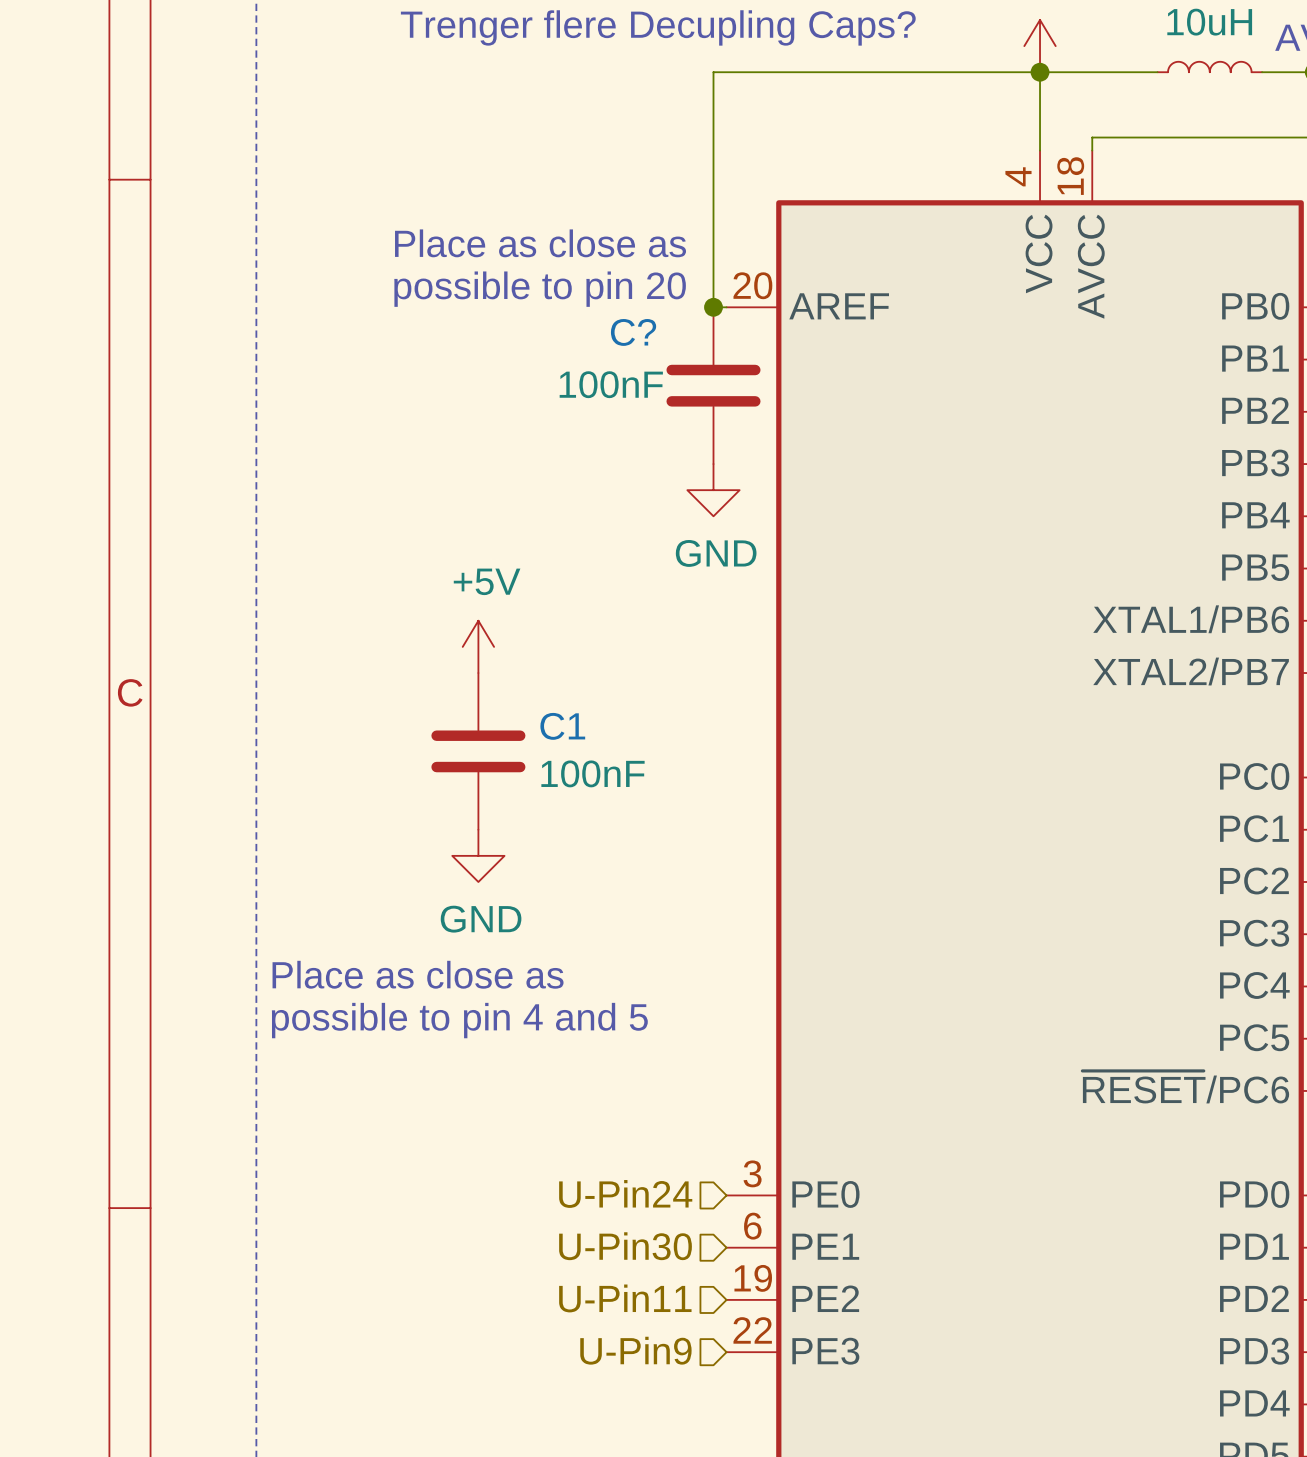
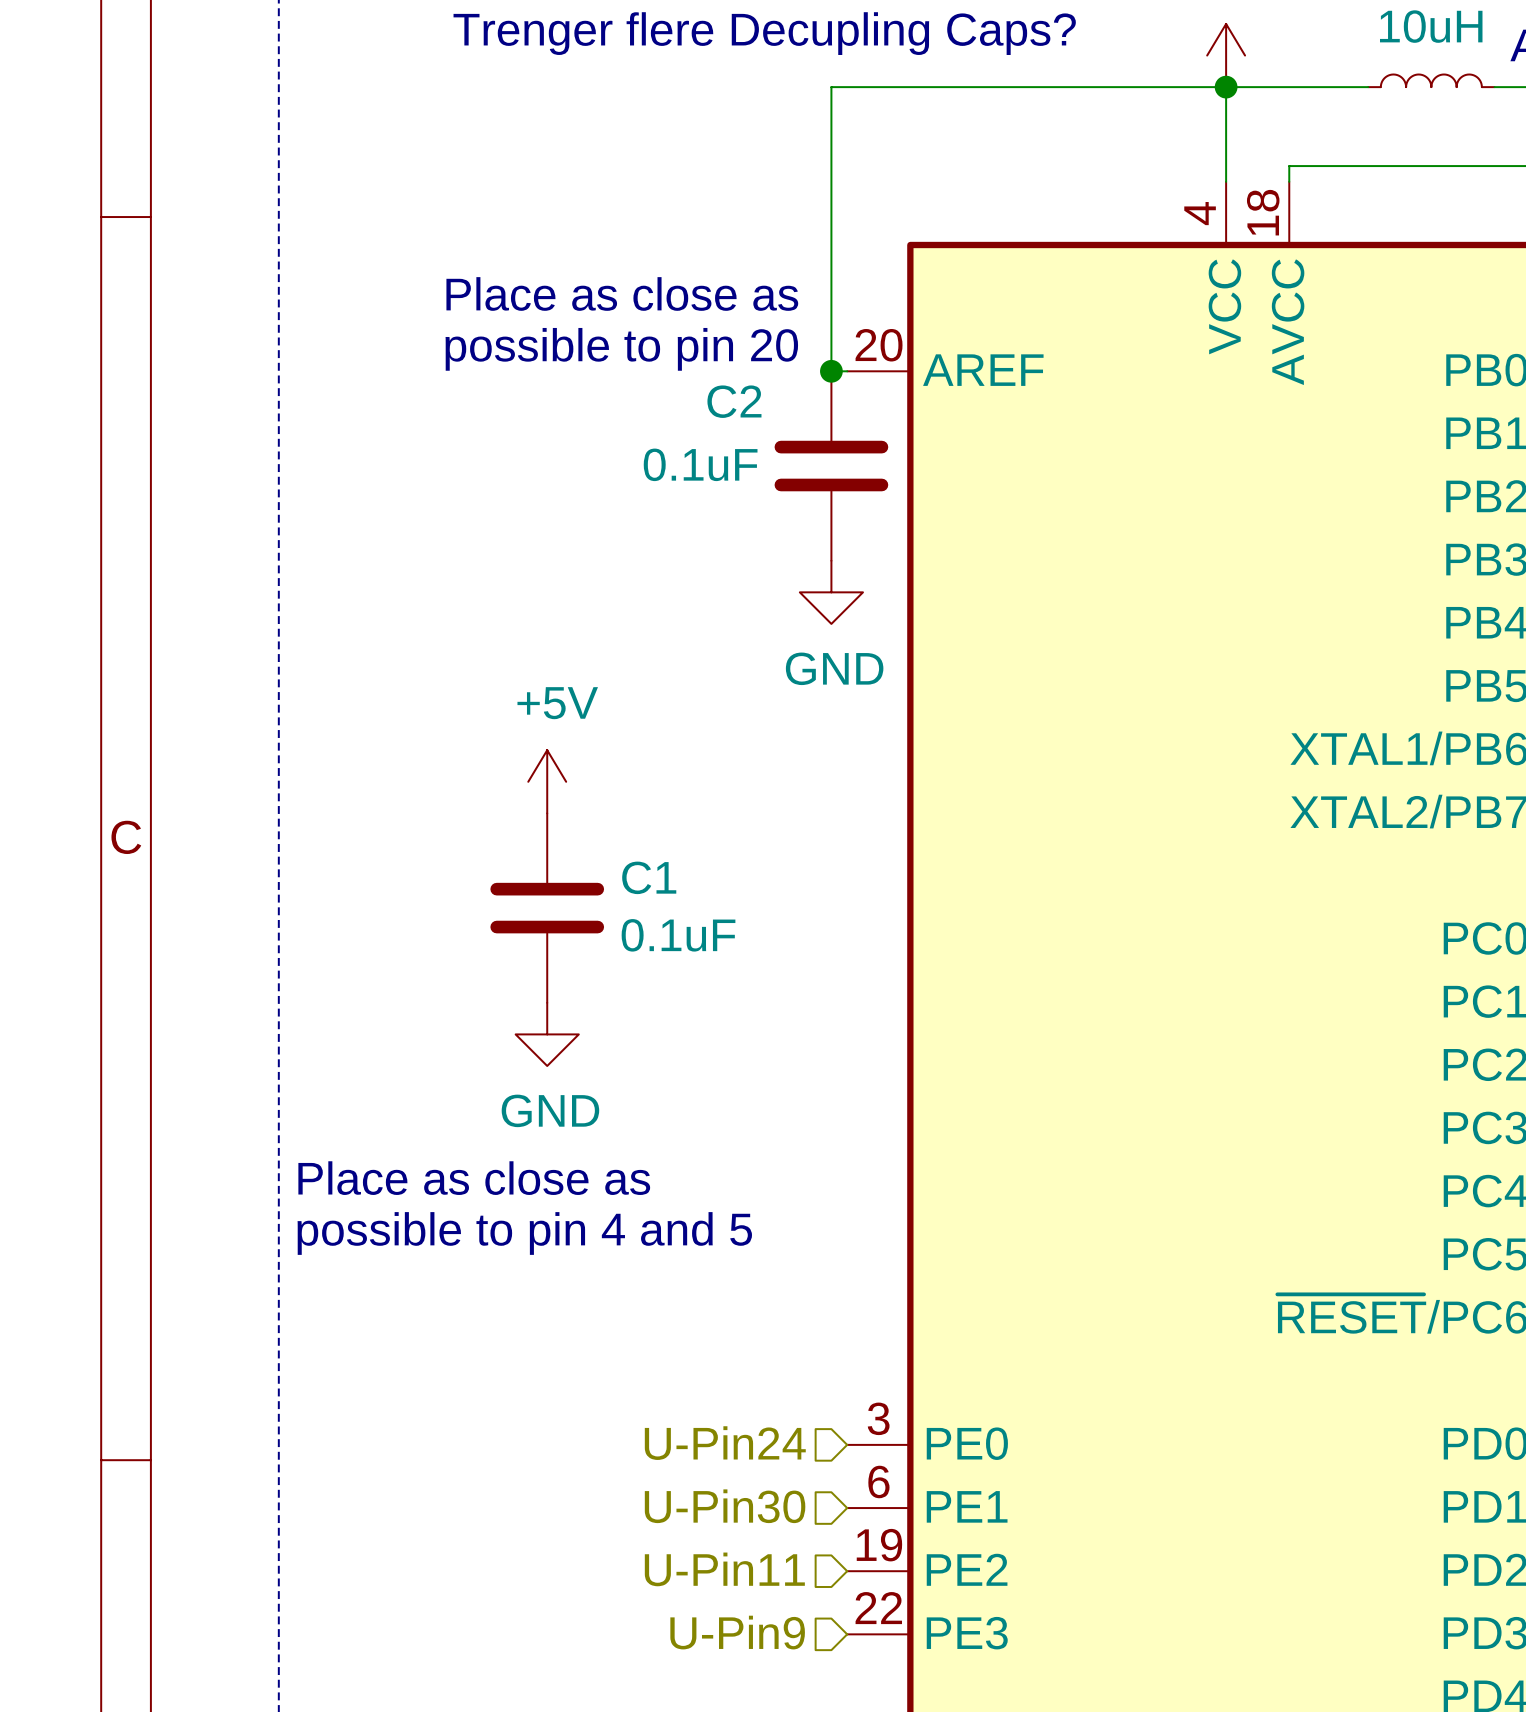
C? name: C? (633, 332) -> C2 (734, 401)
C? value: 100nF (611, 384) -> 0.1uF (700, 464)
C1 value: 100nF (593, 773) -> 0.1uF (678, 935)

